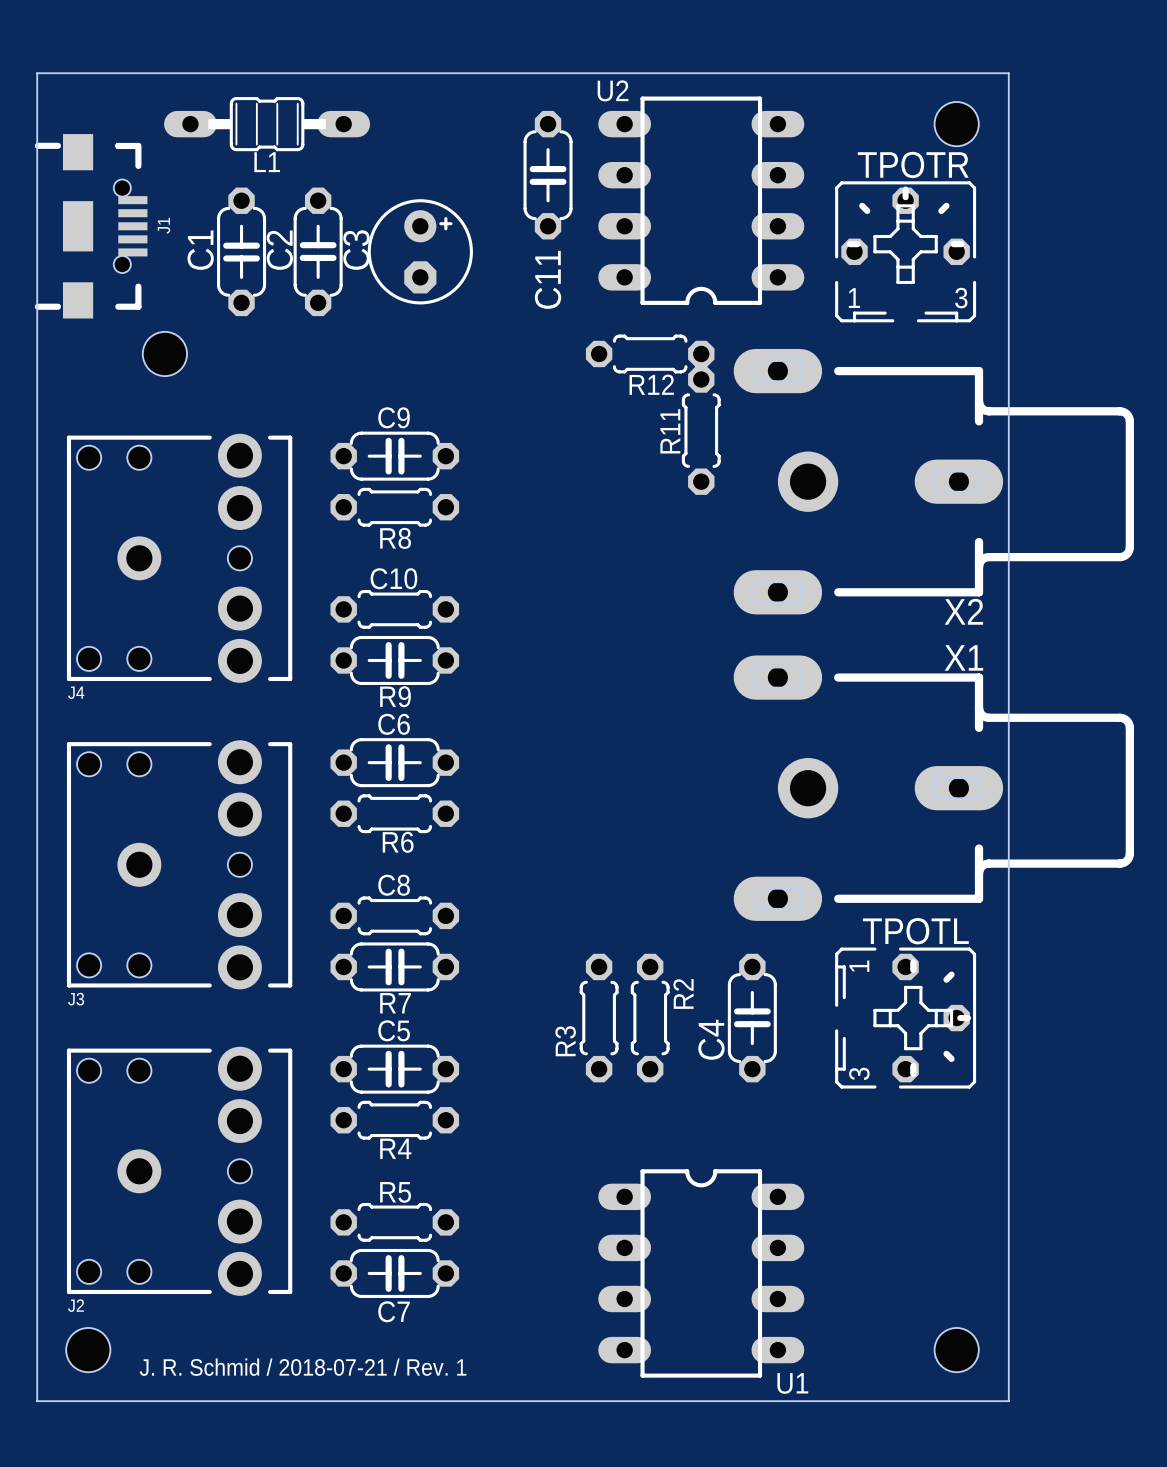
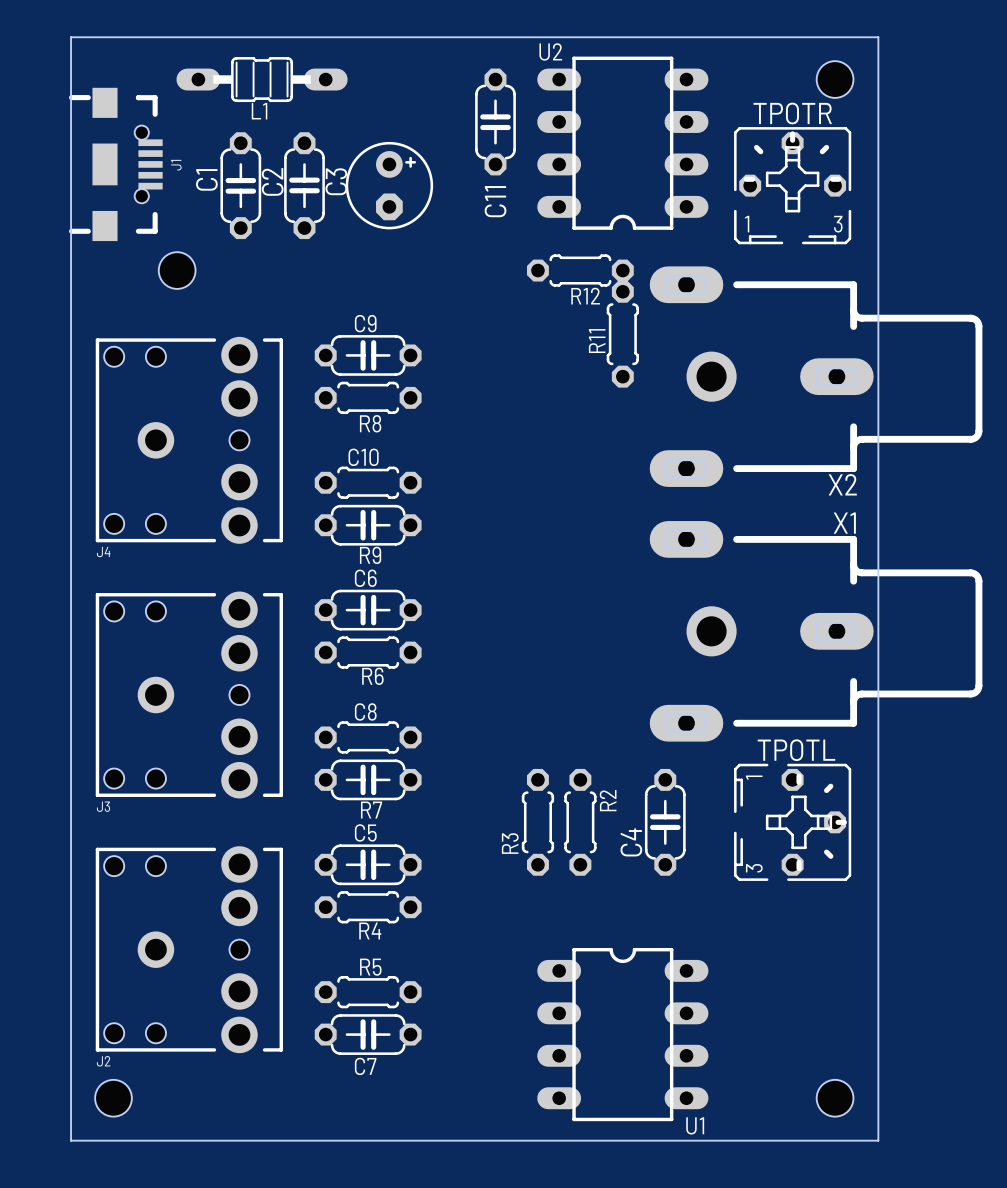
text: J. R. Schmid / 2018-07-21 / Rev. 1 (303, 1367) -> none

